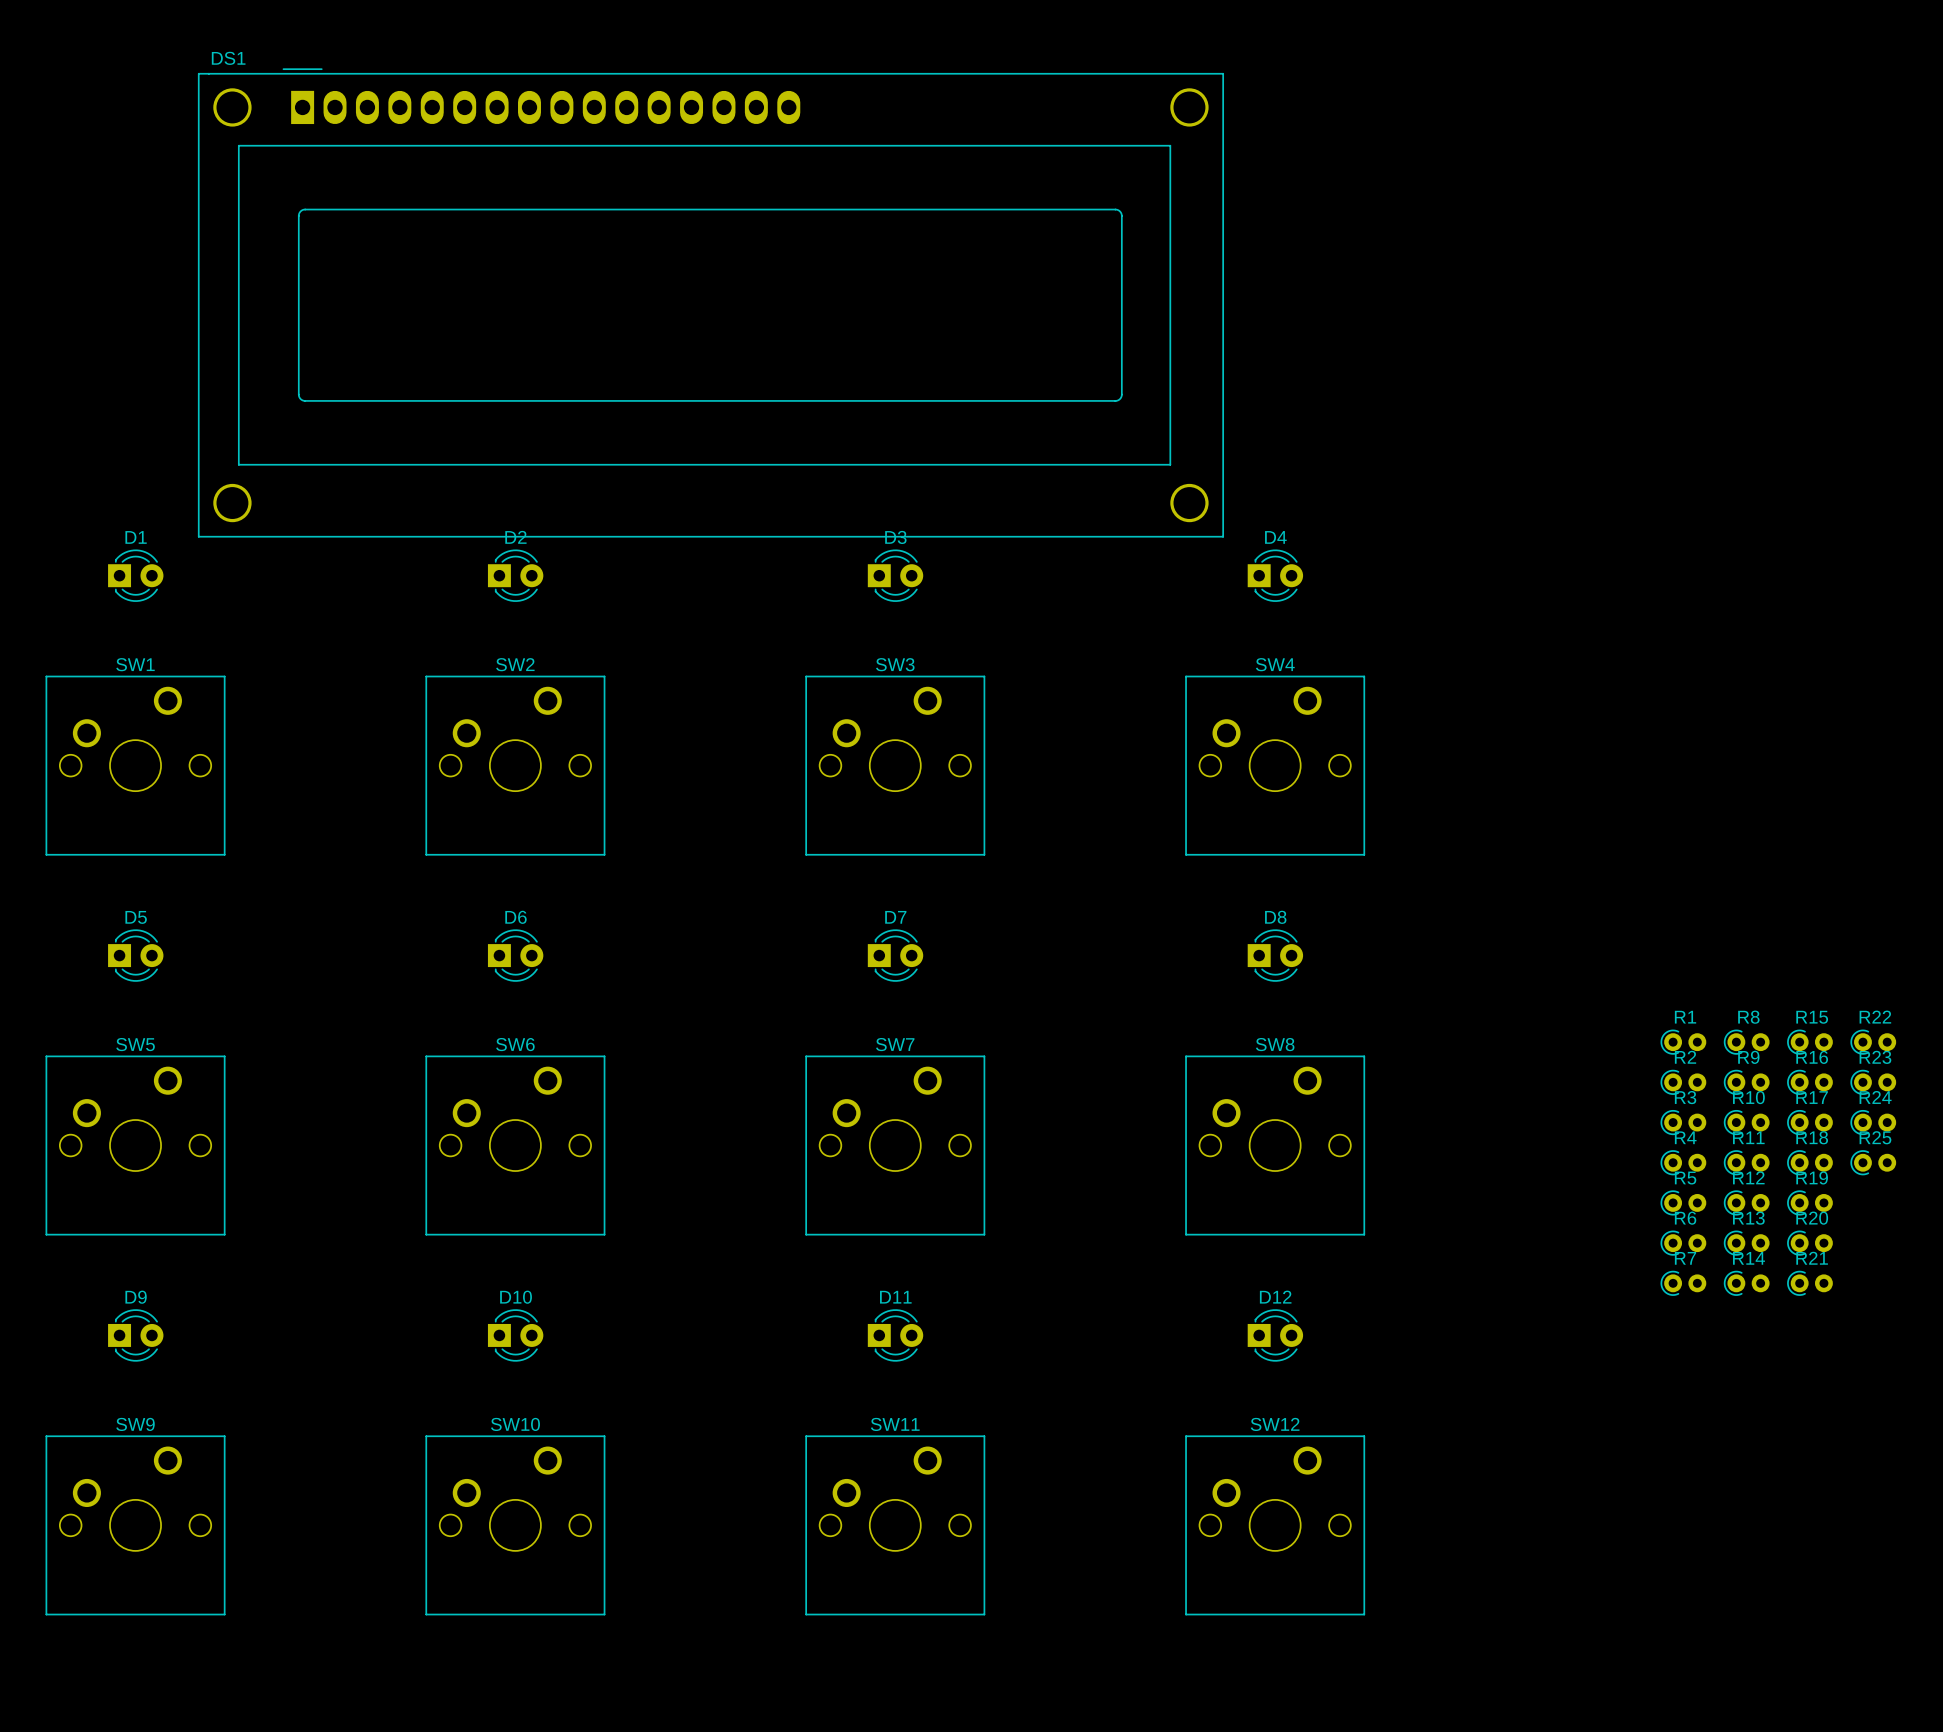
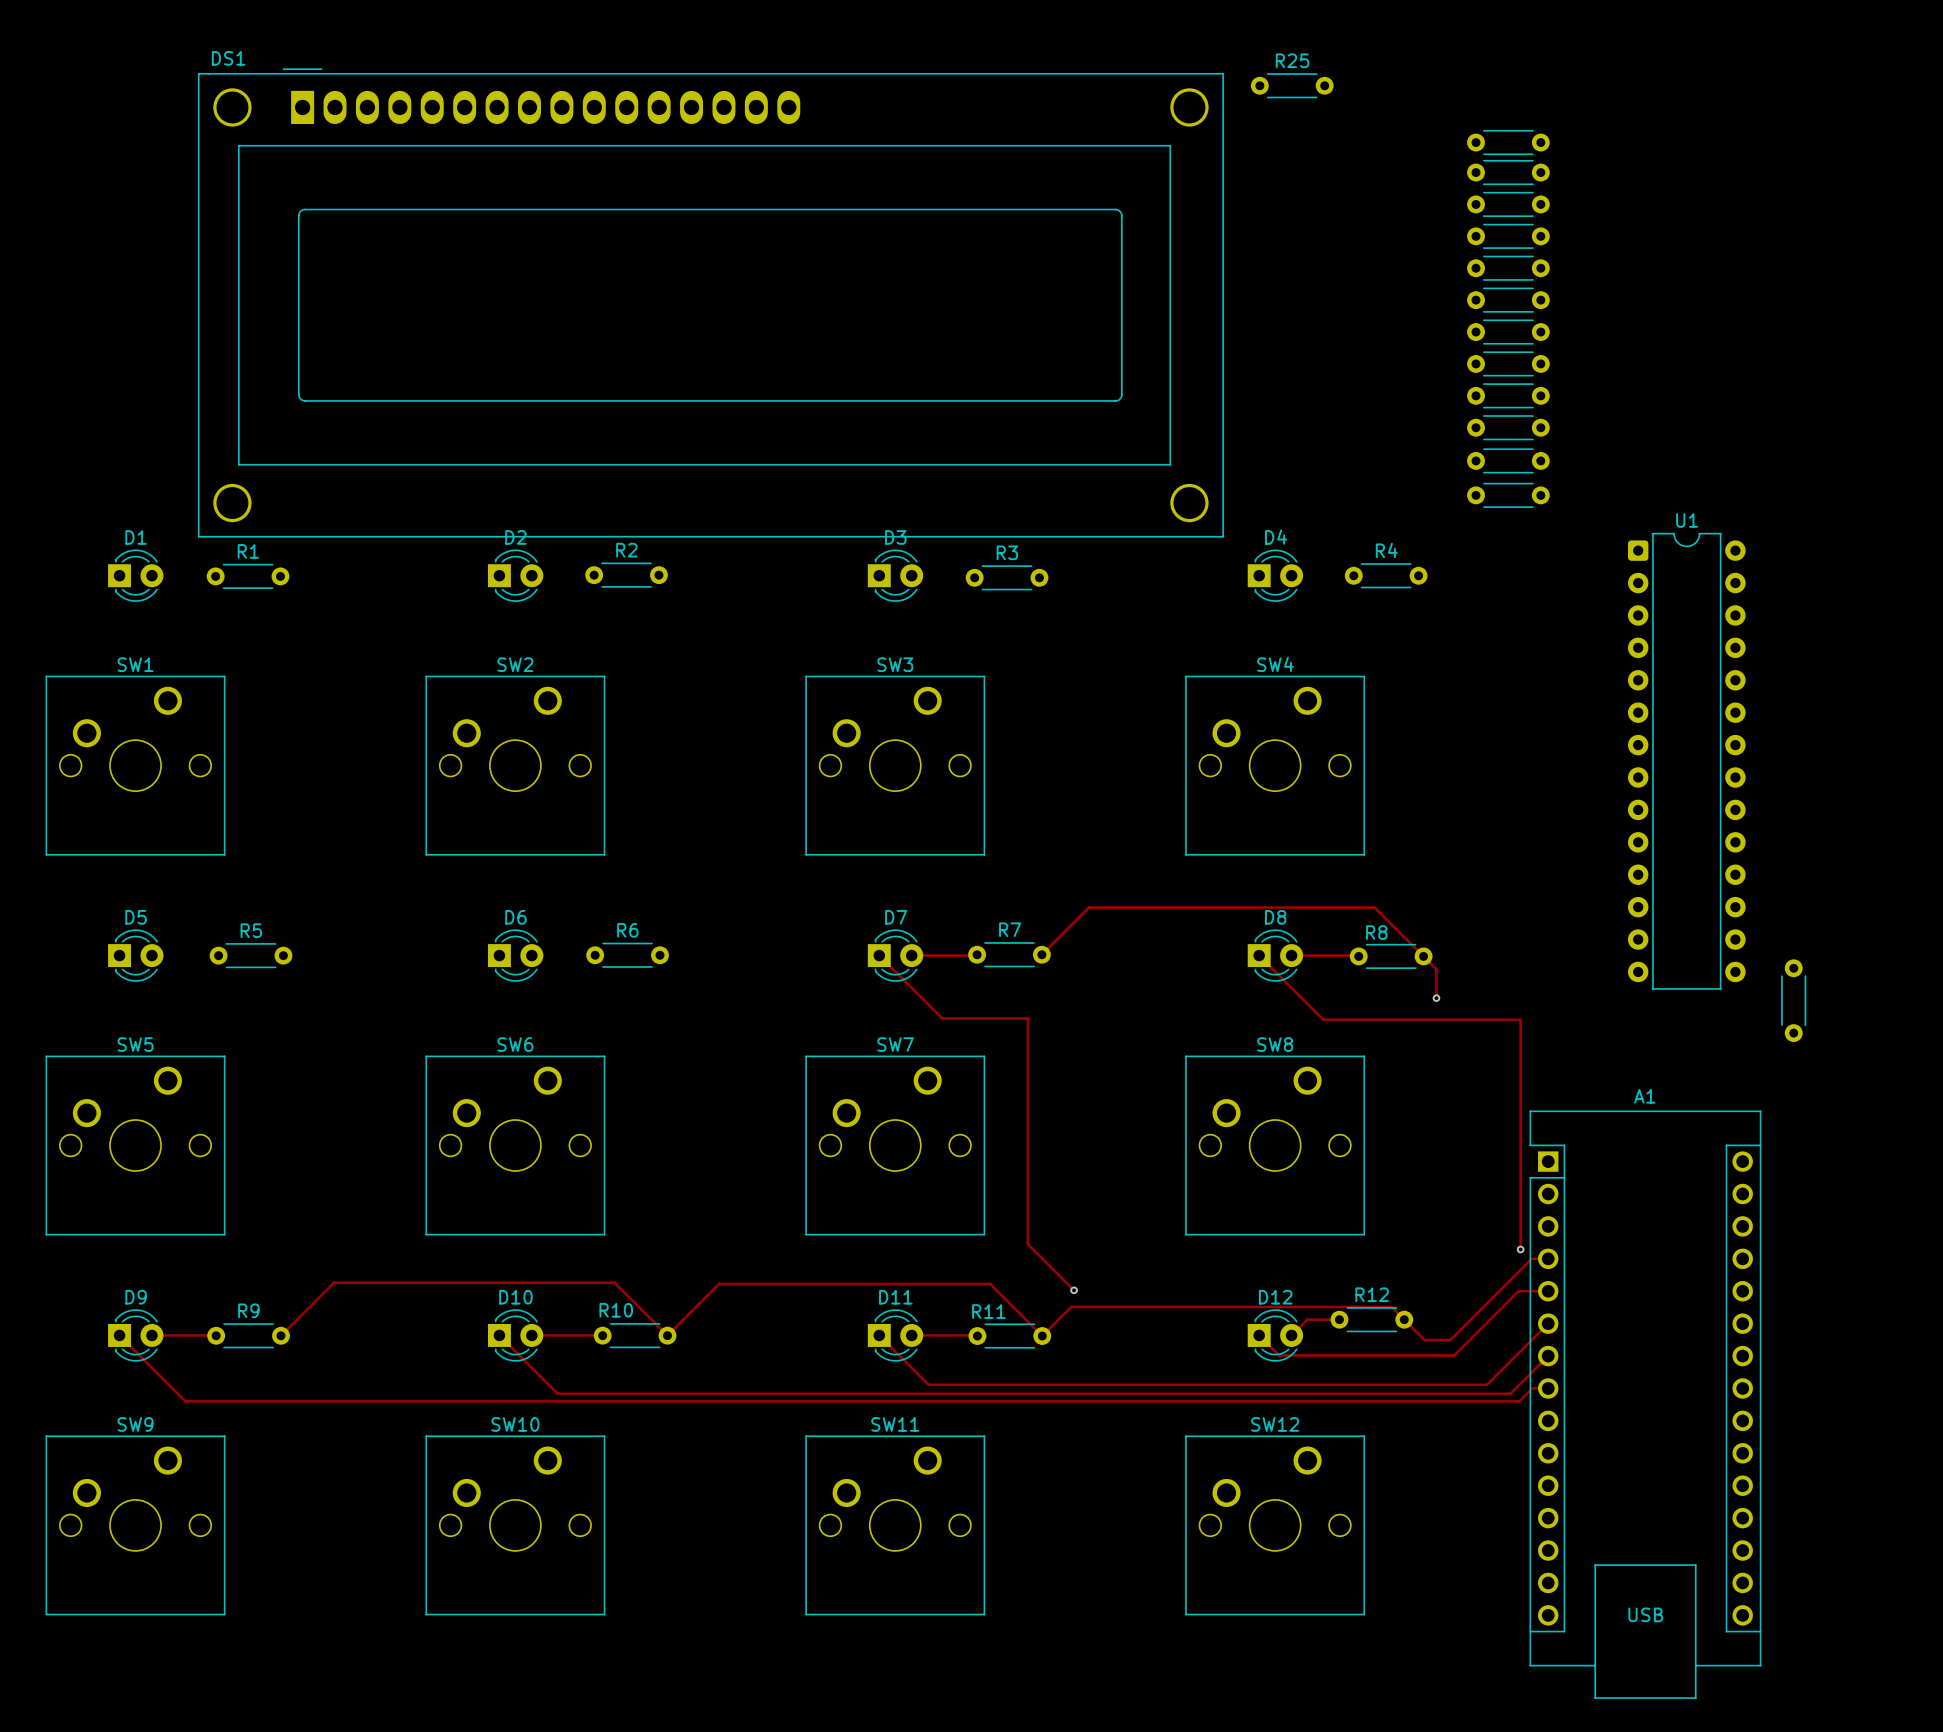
part: none -> (1508, 142)
part: none -> (1508, 172)
part: none -> (1508, 204)
part: none -> (1508, 236)
part: none -> (1508, 268)
part: none -> (1508, 300)
part: none -> (1508, 332)
part: none -> (1508, 363)
part: none -> (1508, 395)
part: none -> (1508, 427)
part: none -> (1508, 460)
part: none -> (1508, 495)
U1: none -> (1686, 761)
track: none -> (977, 954) (911, 955)
track: none -> (1041, 954) (1089, 907) (1374, 907) (1436, 969) (1436, 998)
track: none -> (879, 955) (942, 1018) (1028, 1018) (1028, 1244) (1074, 1290)
track: none -> (1259, 955) (1323, 1019) (1520, 1019) (1520, 1249)
track: none -> (1291, 955) (1358, 956)
via: none -> (1436, 998)
part: none -> (1793, 1000)
R1 footprint: [1660, 1029, 1707, 1055] -> [206, 563, 290, 589]
R8 footprint: [1723, 1029, 1770, 1055] -> [1349, 943, 1433, 969]
R15: (1810, 1042) -> none
R22: (1873, 1042) -> none
R2 footprint: [1660, 1069, 1707, 1095] -> [585, 562, 668, 588]
R9 footprint: [1723, 1069, 1770, 1095] -> [207, 1323, 290, 1349]
R16: (1810, 1082) -> none
R23: (1873, 1082) -> none
R3 footprint: [1660, 1110, 1707, 1136] -> [965, 565, 1049, 591]
R10 footprint: [1723, 1110, 1770, 1136] -> [593, 1323, 677, 1349]
R17: (1810, 1122) -> none
R24: (1873, 1122) -> none
R4 footprint: [1660, 1150, 1707, 1176] -> [1344, 563, 1428, 589]
R11 footprint: [1723, 1150, 1770, 1176] -> [968, 1323, 1052, 1349]
R25 footprint: [1850, 1150, 1897, 1176] -> [1250, 73, 1334, 99]
R18: (1810, 1162) -> none
R5 footprint: [1660, 1190, 1707, 1216] -> [209, 943, 293, 969]
R12 footprint: [1723, 1190, 1770, 1216] -> [1330, 1307, 1414, 1333]
R19: (1810, 1202) -> none
R6 footprint: [1660, 1230, 1707, 1256] -> [586, 942, 669, 968]
R13: (1746, 1243) -> none
R20: (1810, 1243) -> none
via: none -> (1520, 1249)
track: none -> (1548, 1258) (1531, 1258) (1450, 1340) (1424, 1340) (1391, 1306) (1071, 1306) (1042, 1336) (990, 1283) (719, 1283) (667, 1335) (614, 1282) (334, 1282) (280, 1335)
R7 footprint: [1660, 1270, 1707, 1296] -> [968, 942, 1051, 968]
R14: (1746, 1283) -> none
R21: (1810, 1283) -> none
via: none -> (1074, 1290)
track: none -> (1548, 1291) (1518, 1291) (1454, 1355) (1279, 1355) (1259, 1335)
track: none -> (1339, 1319) (1307, 1319) (1291, 1335)
track: none -> (1548, 1323) (1487, 1384) (928, 1384) (879, 1335)
track: none -> (119, 1335) (185, 1401) (1519, 1401) (1532, 1388) (1548, 1388)
track: none -> (151, 1335) (216, 1335)
track: none -> (499, 1335) (557, 1393) (1510, 1393) (1548, 1356)
track: none -> (531, 1335) (602, 1335)
track: none -> (911, 1335) (977, 1336)
A1: none -> (1645, 1404)

